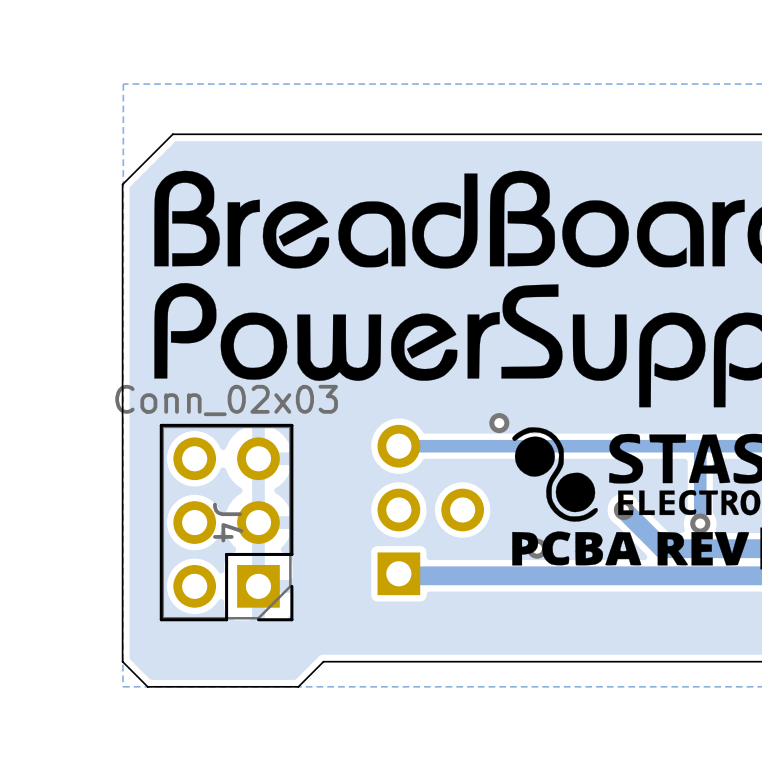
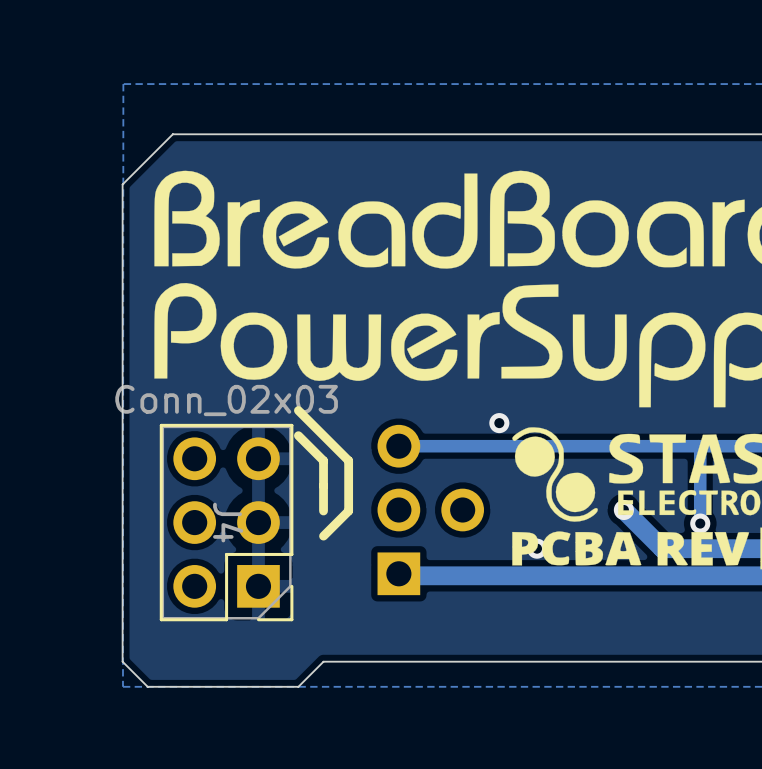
line: none -> (298, 410) (348, 460) (348, 511) (323, 536)
line: none -> (298, 435) (323, 460) (323, 511)

